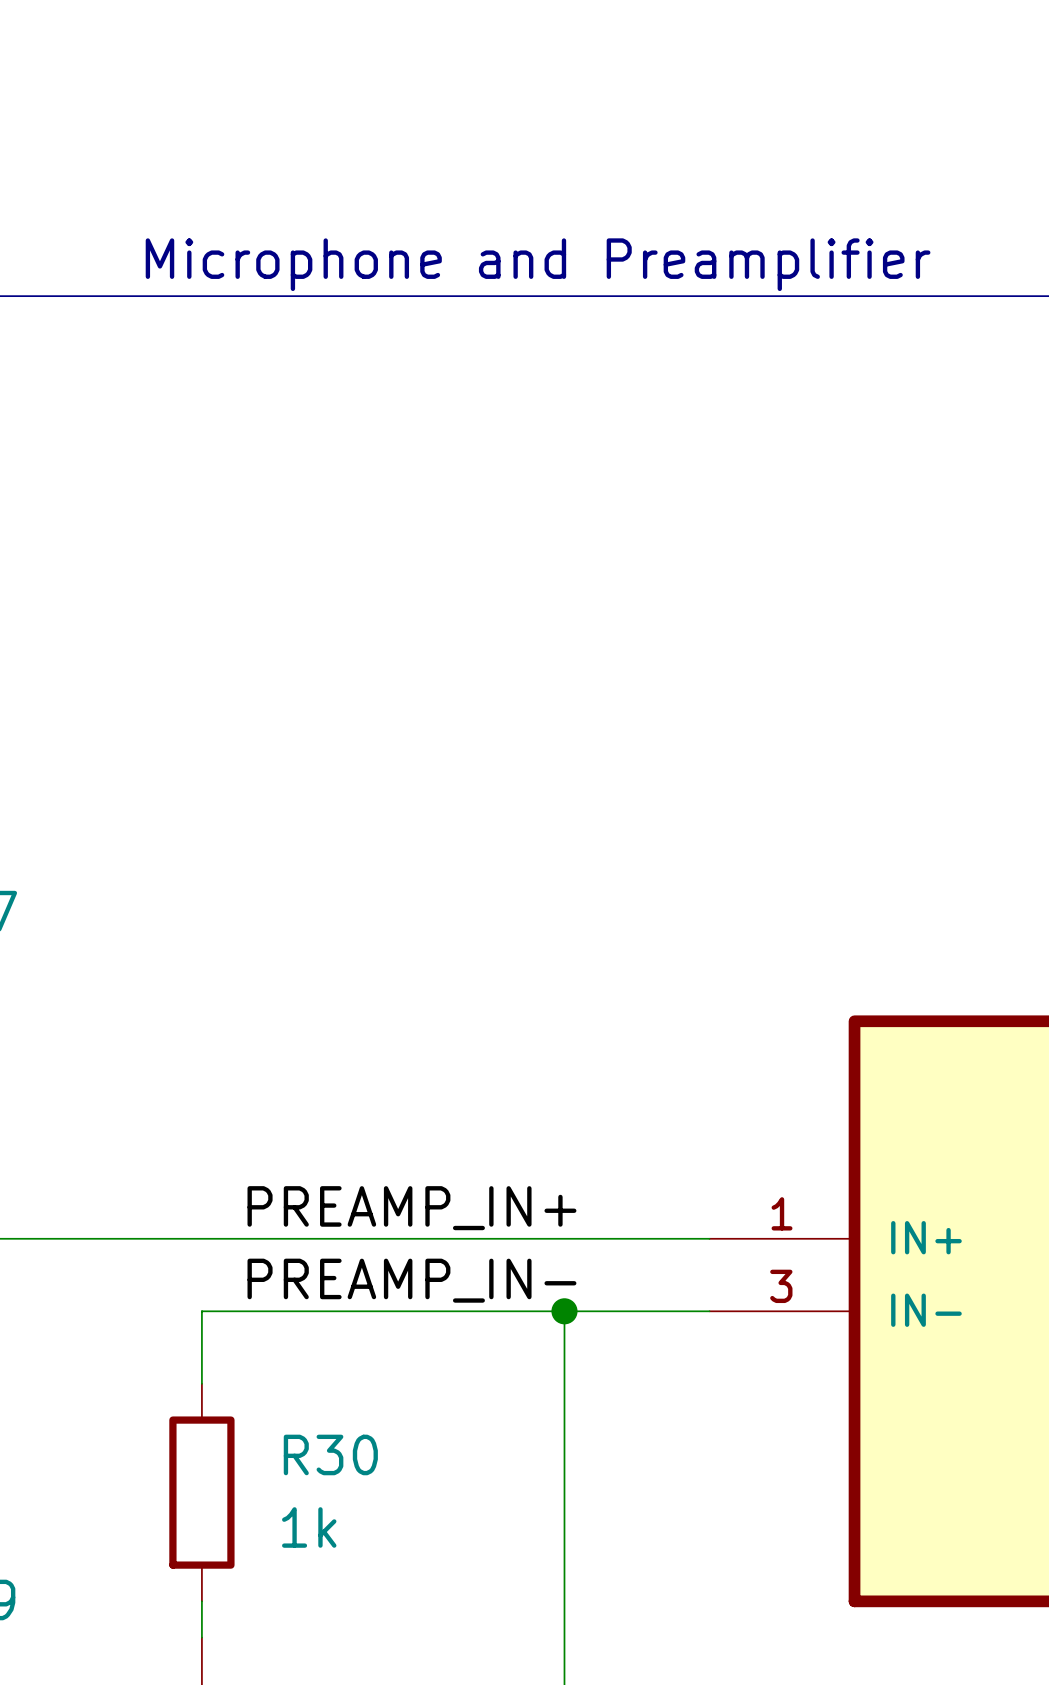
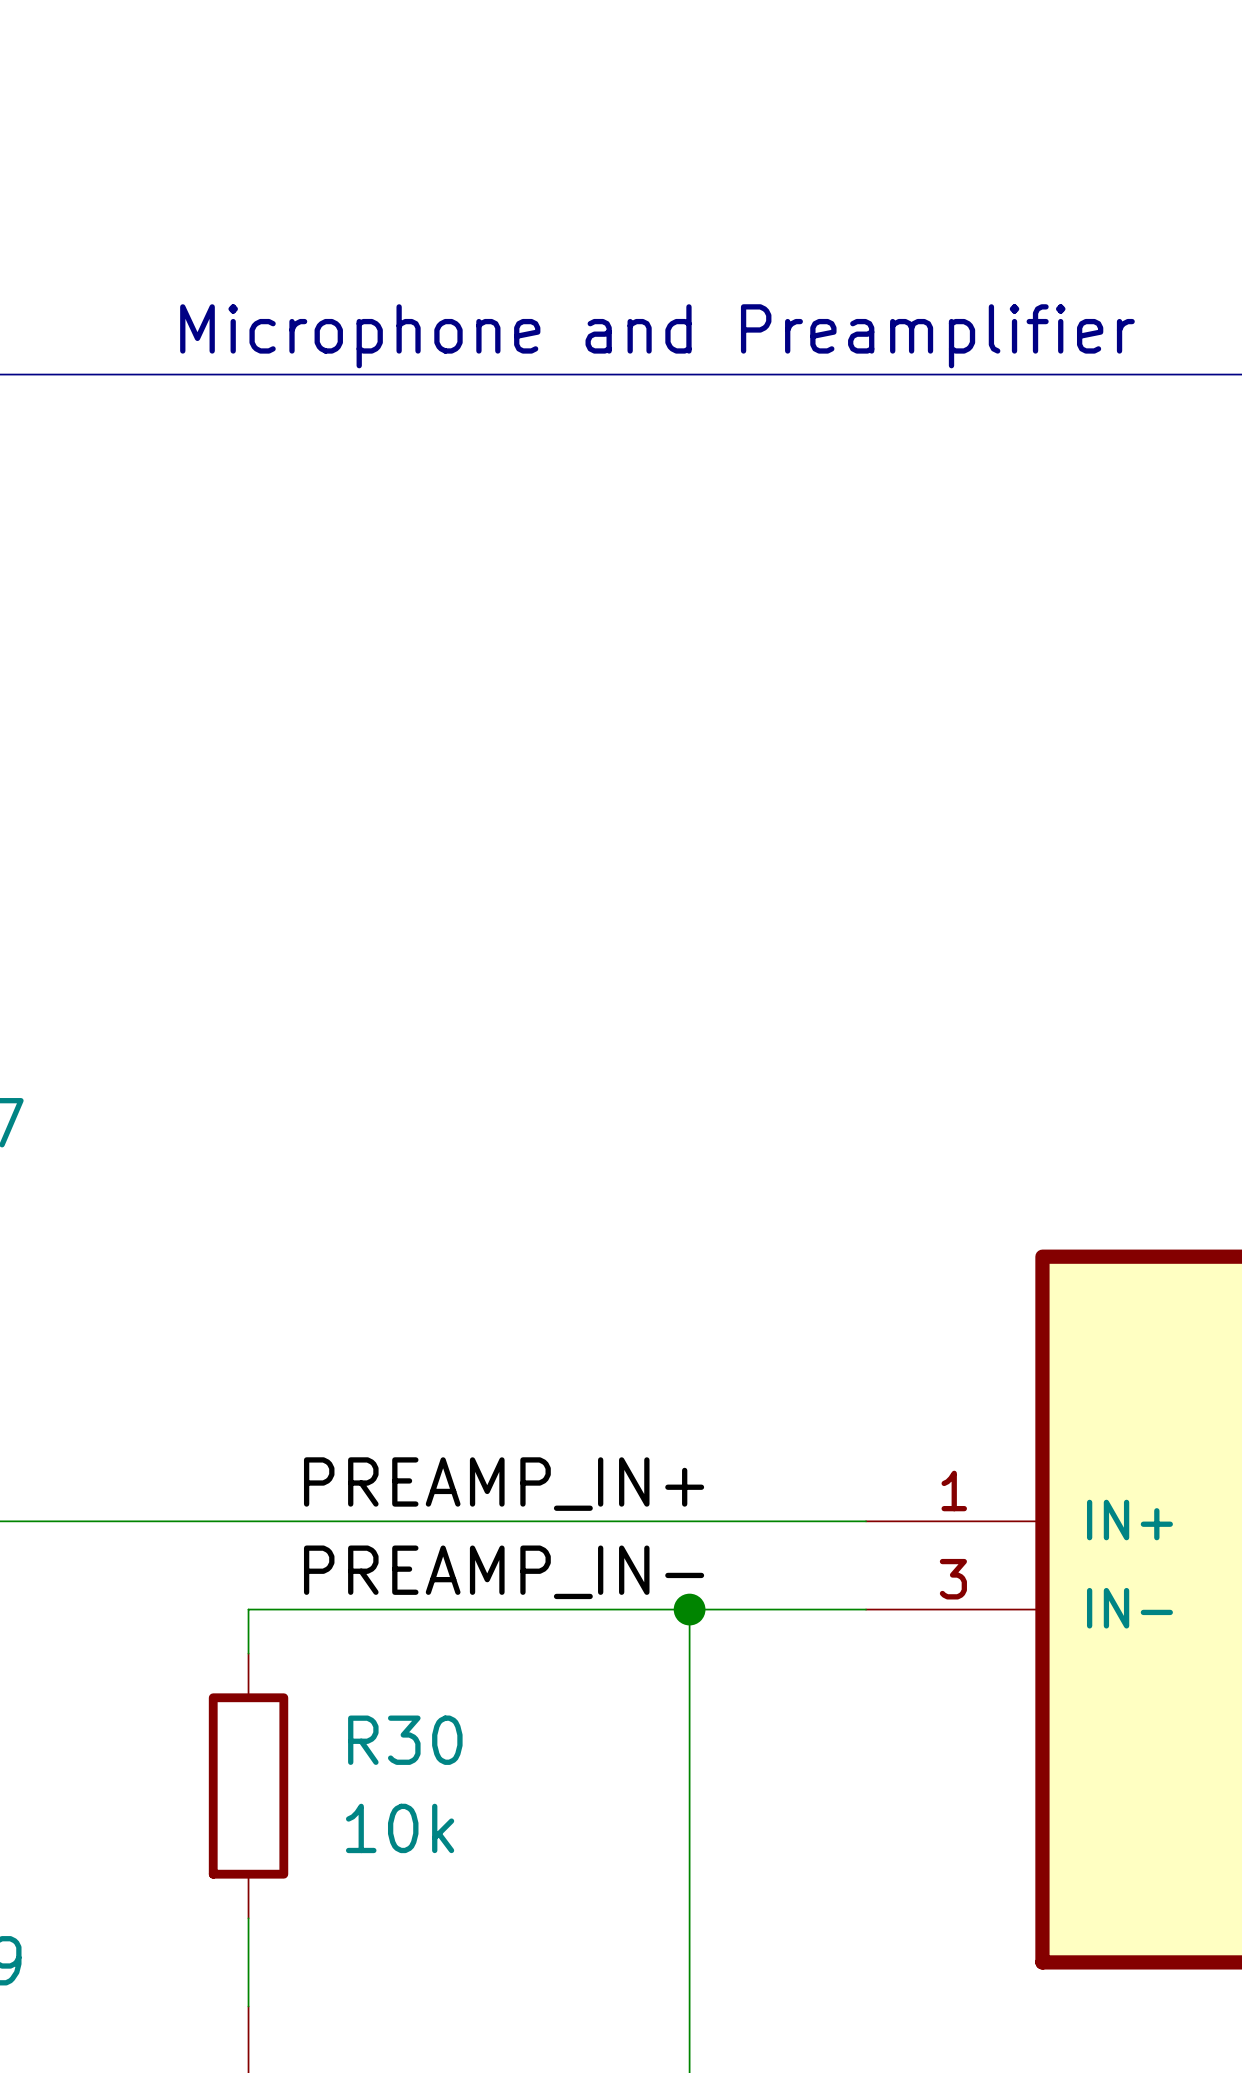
R30 position: (201, 1492) -> (248, 1785)
R30 value: 1k (309, 1527) -> 10k (400, 1828)

